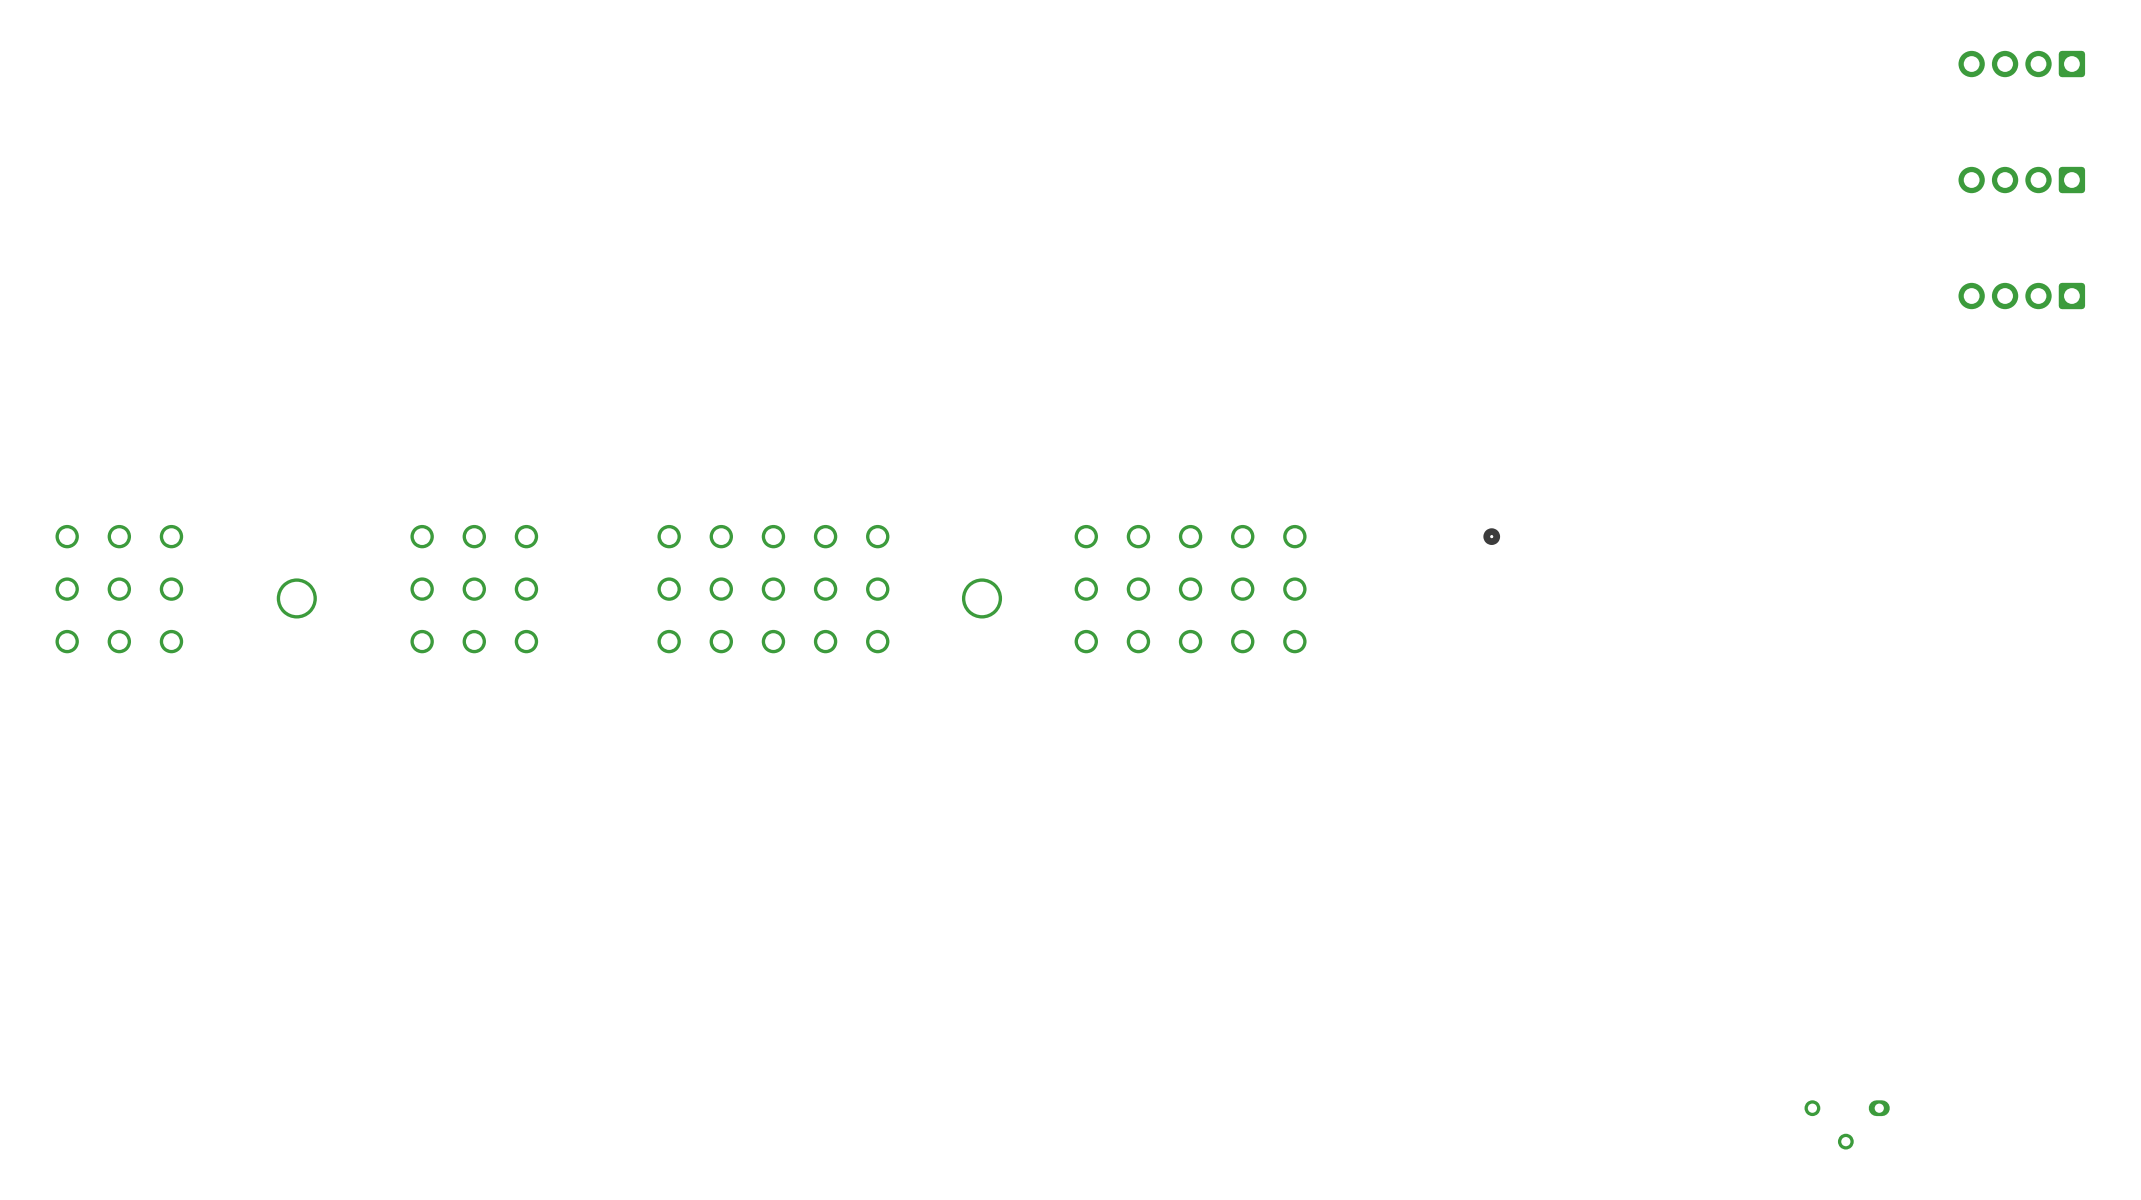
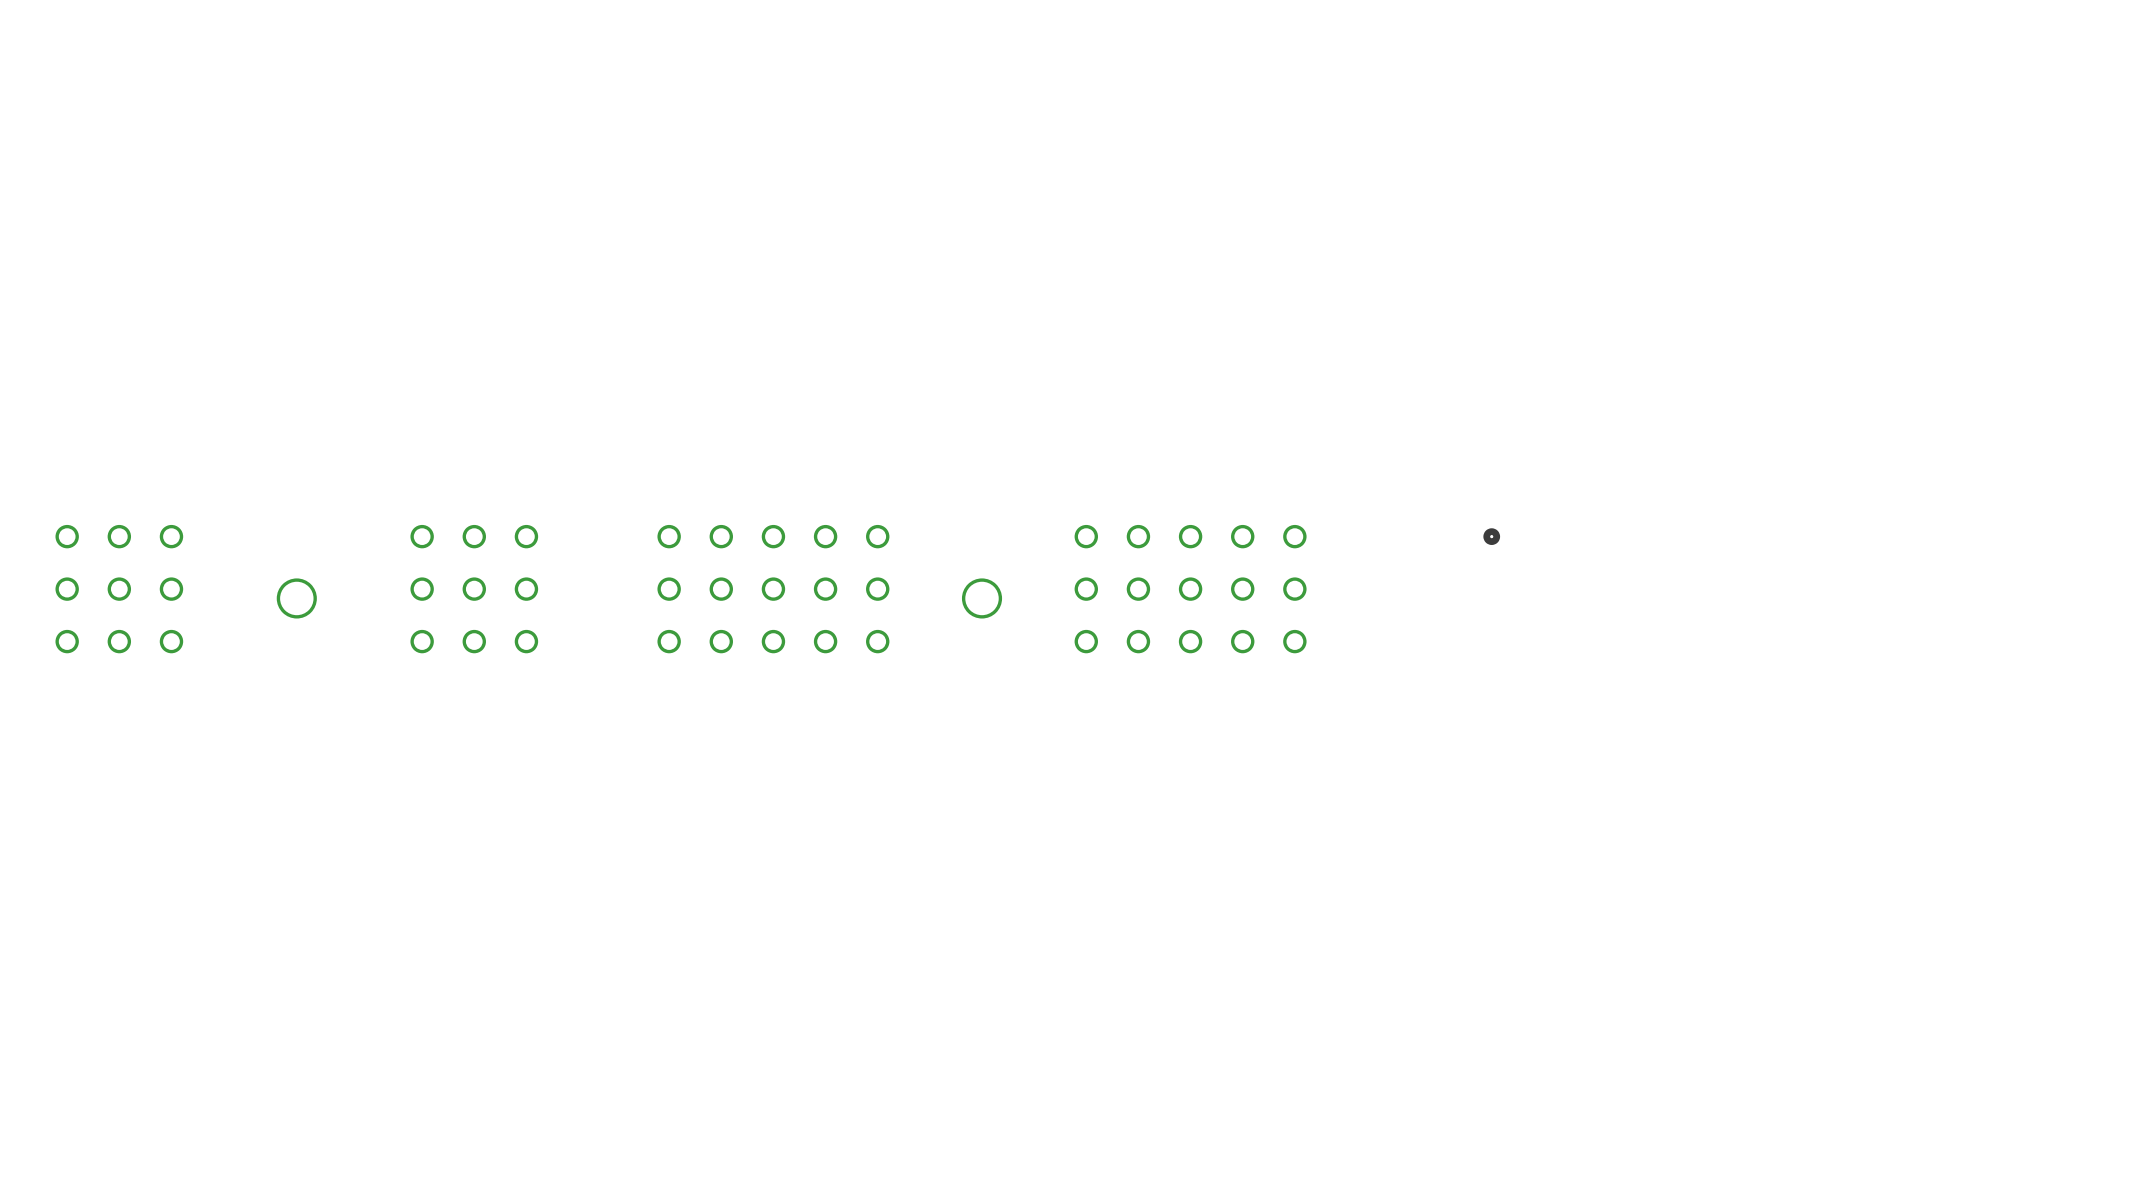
part: (2021, 64) -> none
part: (2021, 180) -> none
part: (2021, 296) -> none
part: (1847, 1124) -> none

